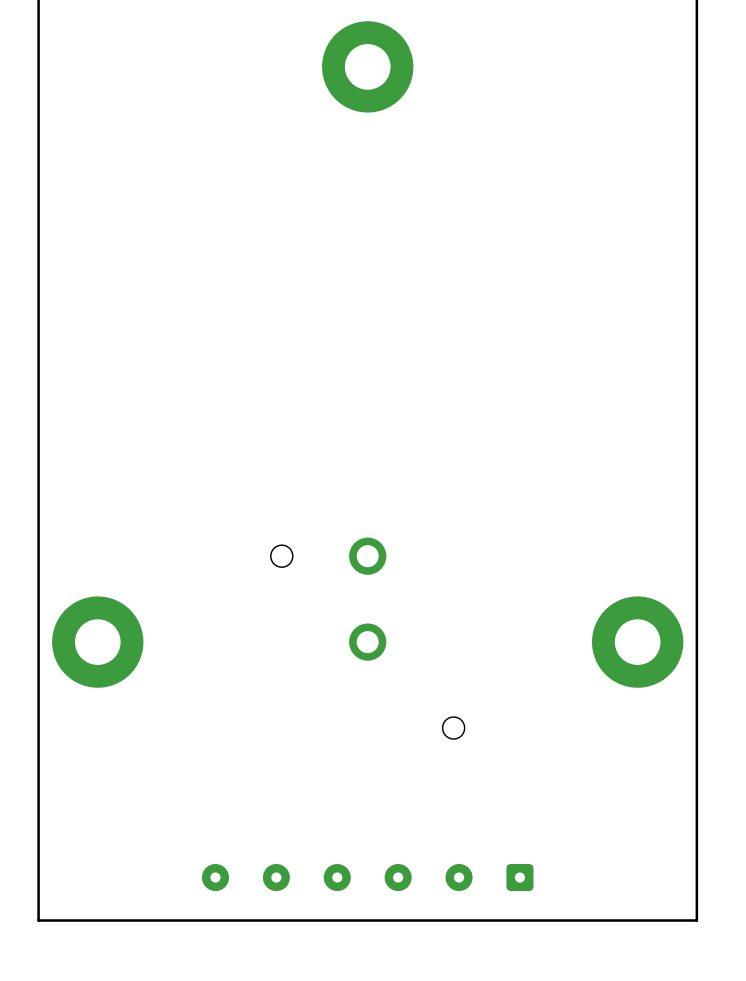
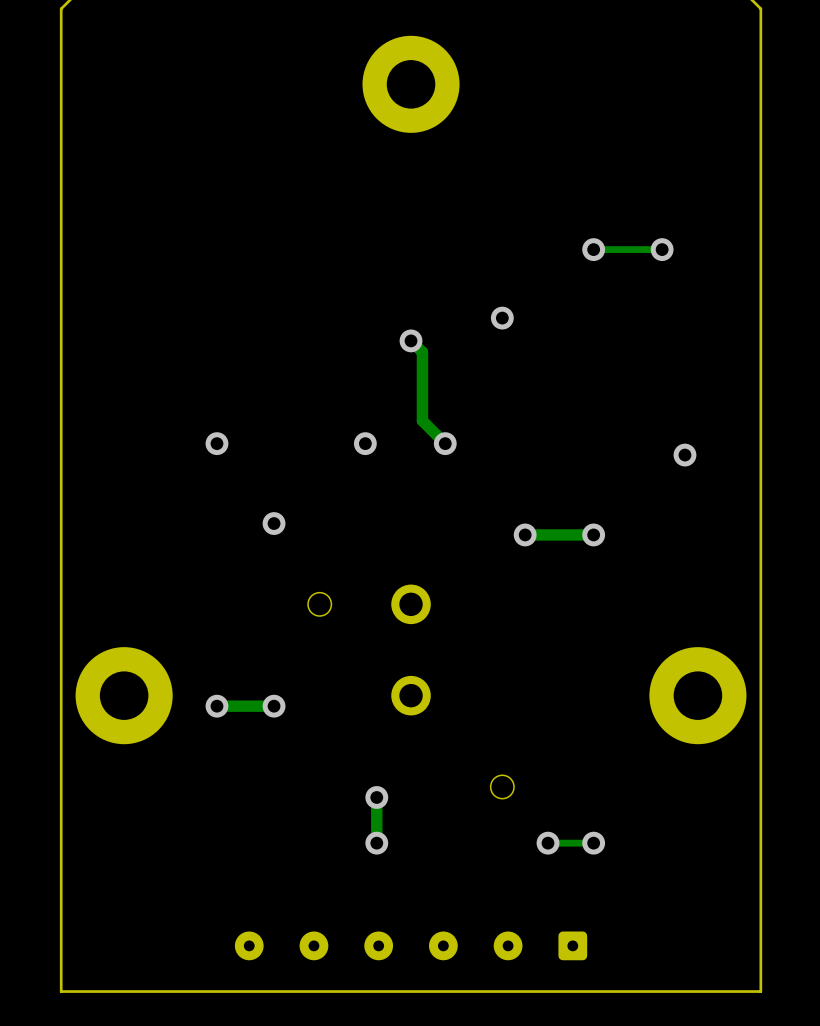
via: none -> (593, 249)
track: none -> (662, 249) (593, 249)
via: none -> (662, 249)
via: none -> (502, 318)
track: none -> (411, 340) (422, 352) (422, 420) (445, 443)
via: none -> (411, 340)
via: none -> (216, 443)
via: none -> (365, 443)
via: none -> (445, 443)
via: none -> (684, 455)
via: none -> (274, 523)
via: none -> (525, 534)
track: none -> (593, 534) (525, 534)
via: none -> (593, 534)
via: none -> (216, 706)
track: none -> (274, 706) (216, 706)
via: none -> (274, 706)
track: none -> (376, 797) (376, 843)
via: none -> (376, 797)
via: none -> (376, 843)
via: none -> (548, 843)
track: none -> (593, 843) (548, 843)
via: none -> (593, 843)

